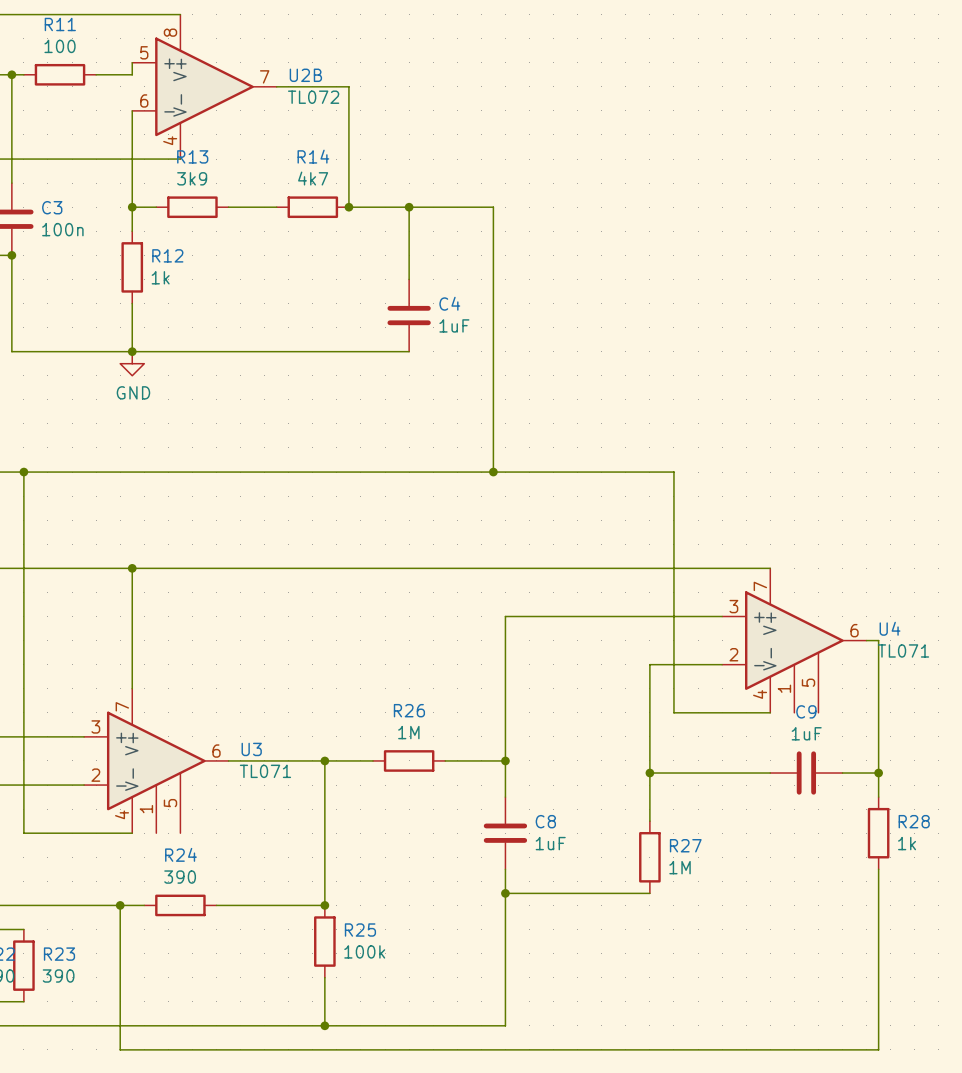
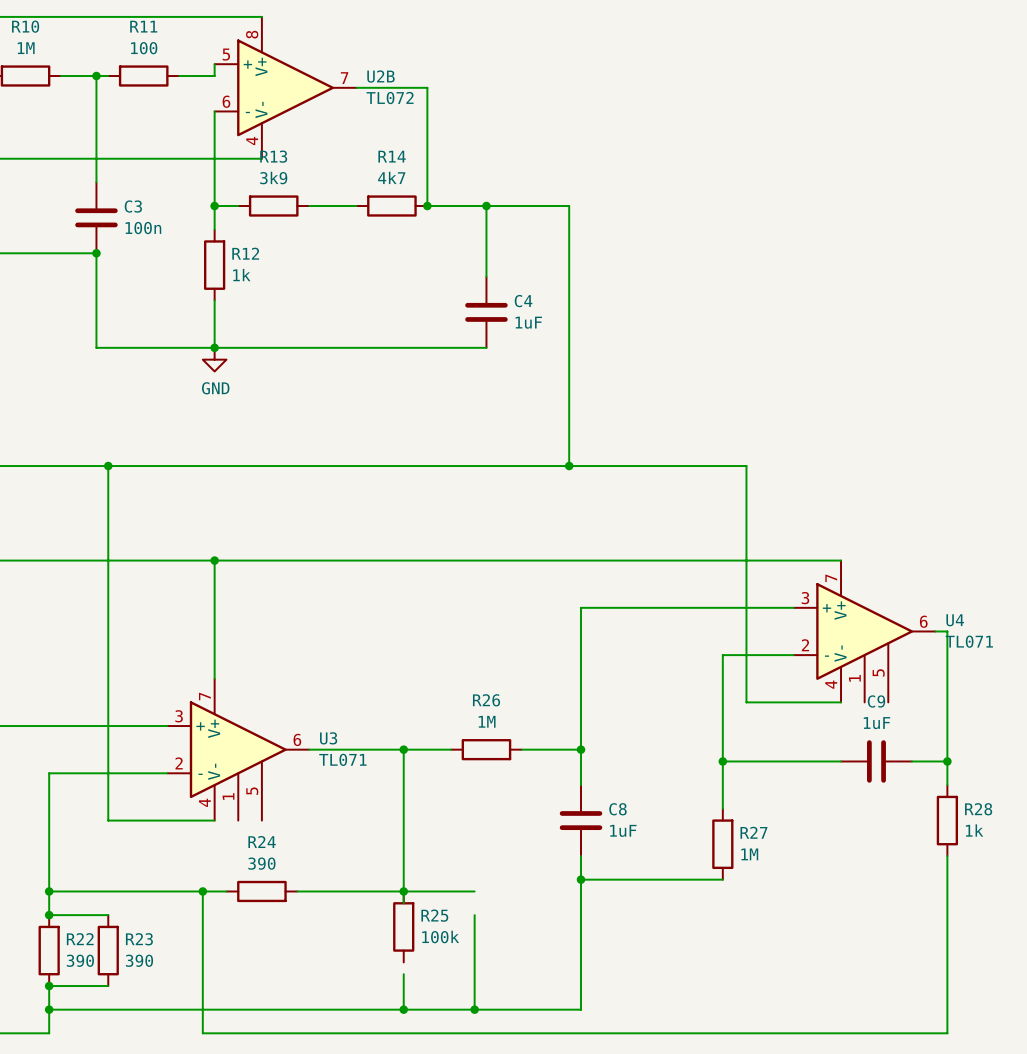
wire: none -> (474, 891) (403, 891) (403, 903)
wire: none -> (474, 915) (474, 1009)
wire: (324, 977) (324, 989) -> none
junction: none -> (474, 1009)

